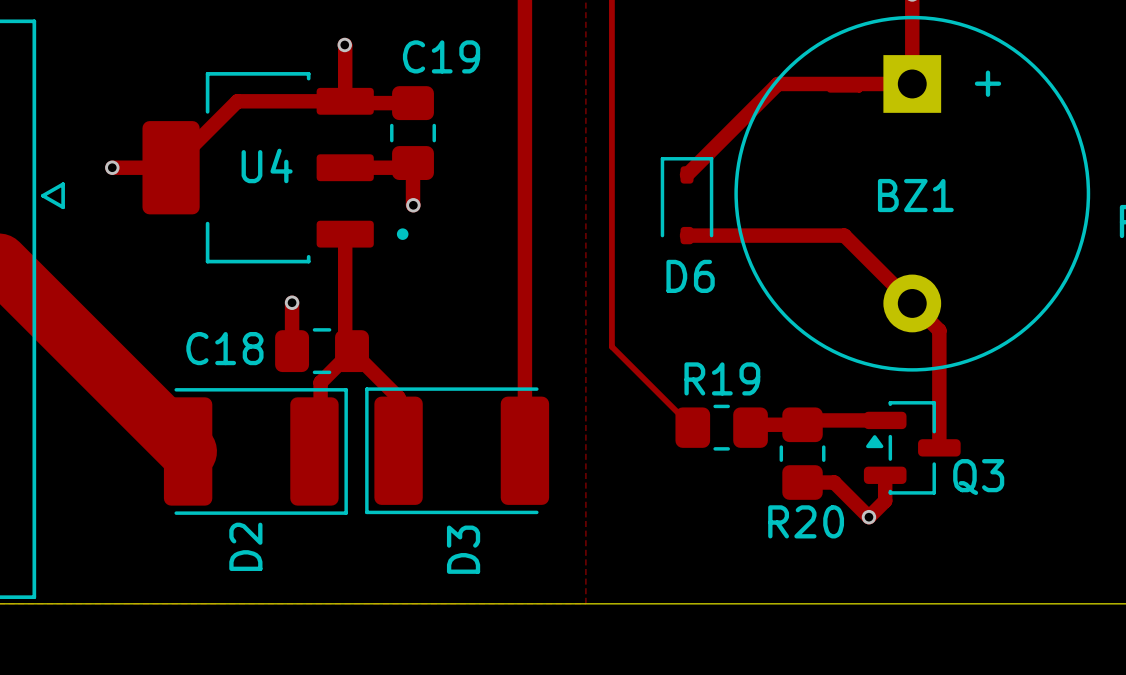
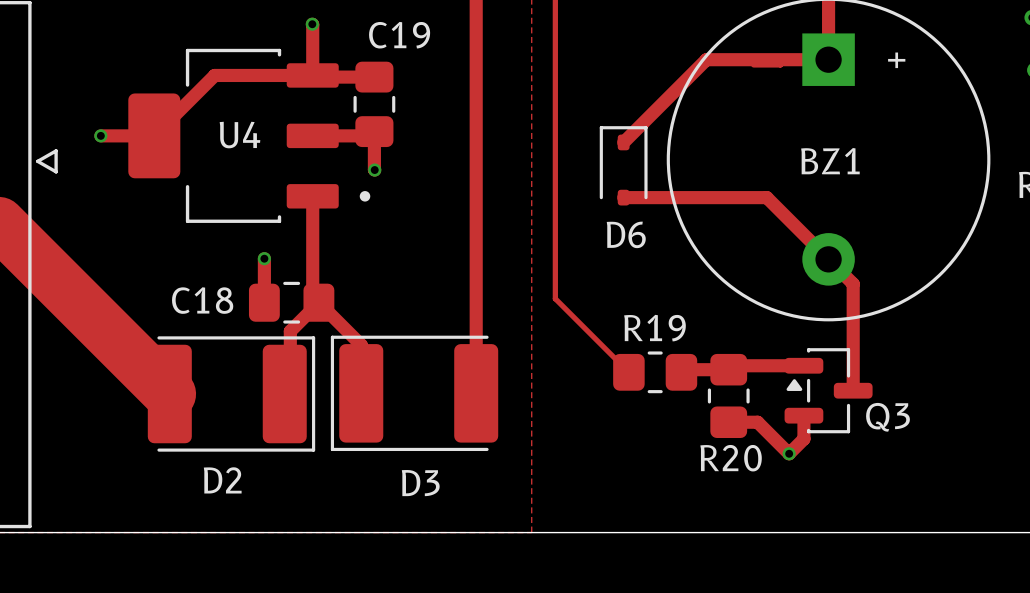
D2 name rotation: 0° (245, 546) -> 90° clockwise (222, 480)
D3 name rotation: 0° (463, 549) -> 90° clockwise (420, 483)

